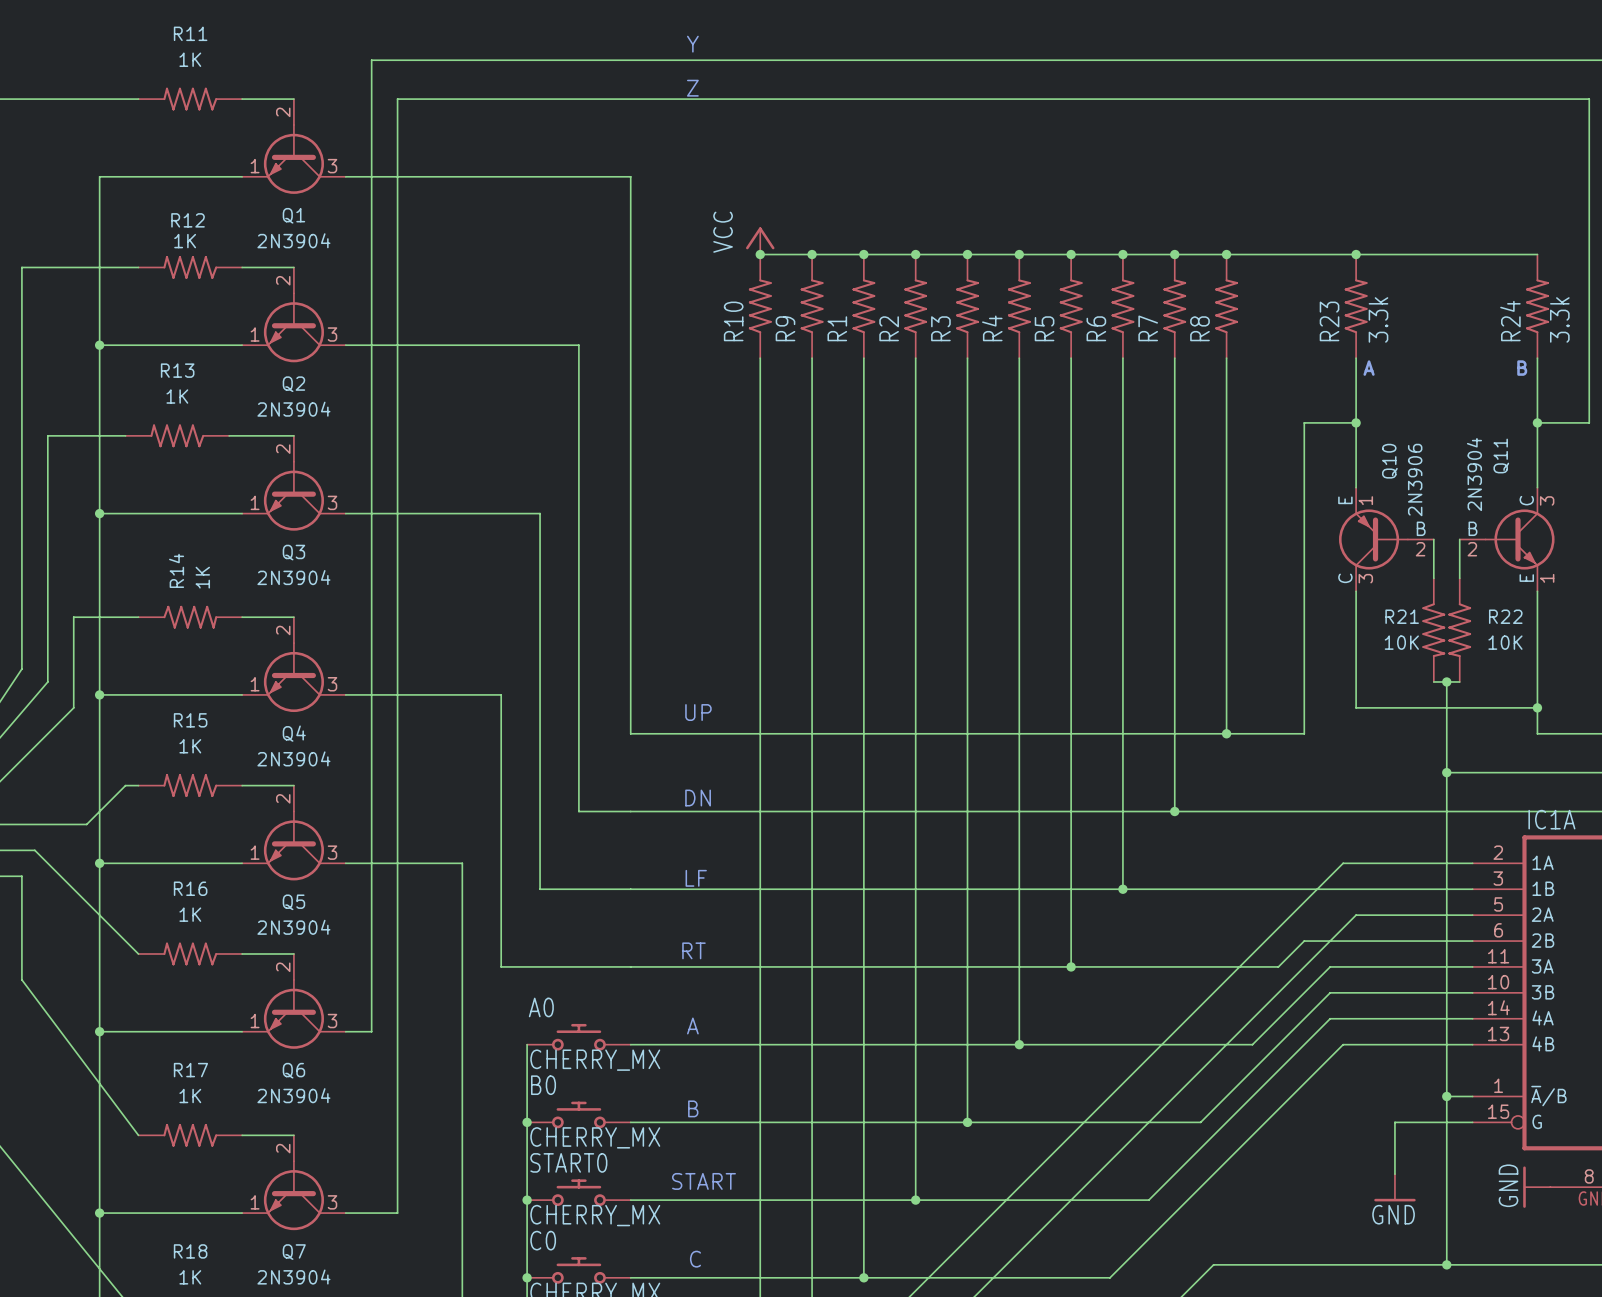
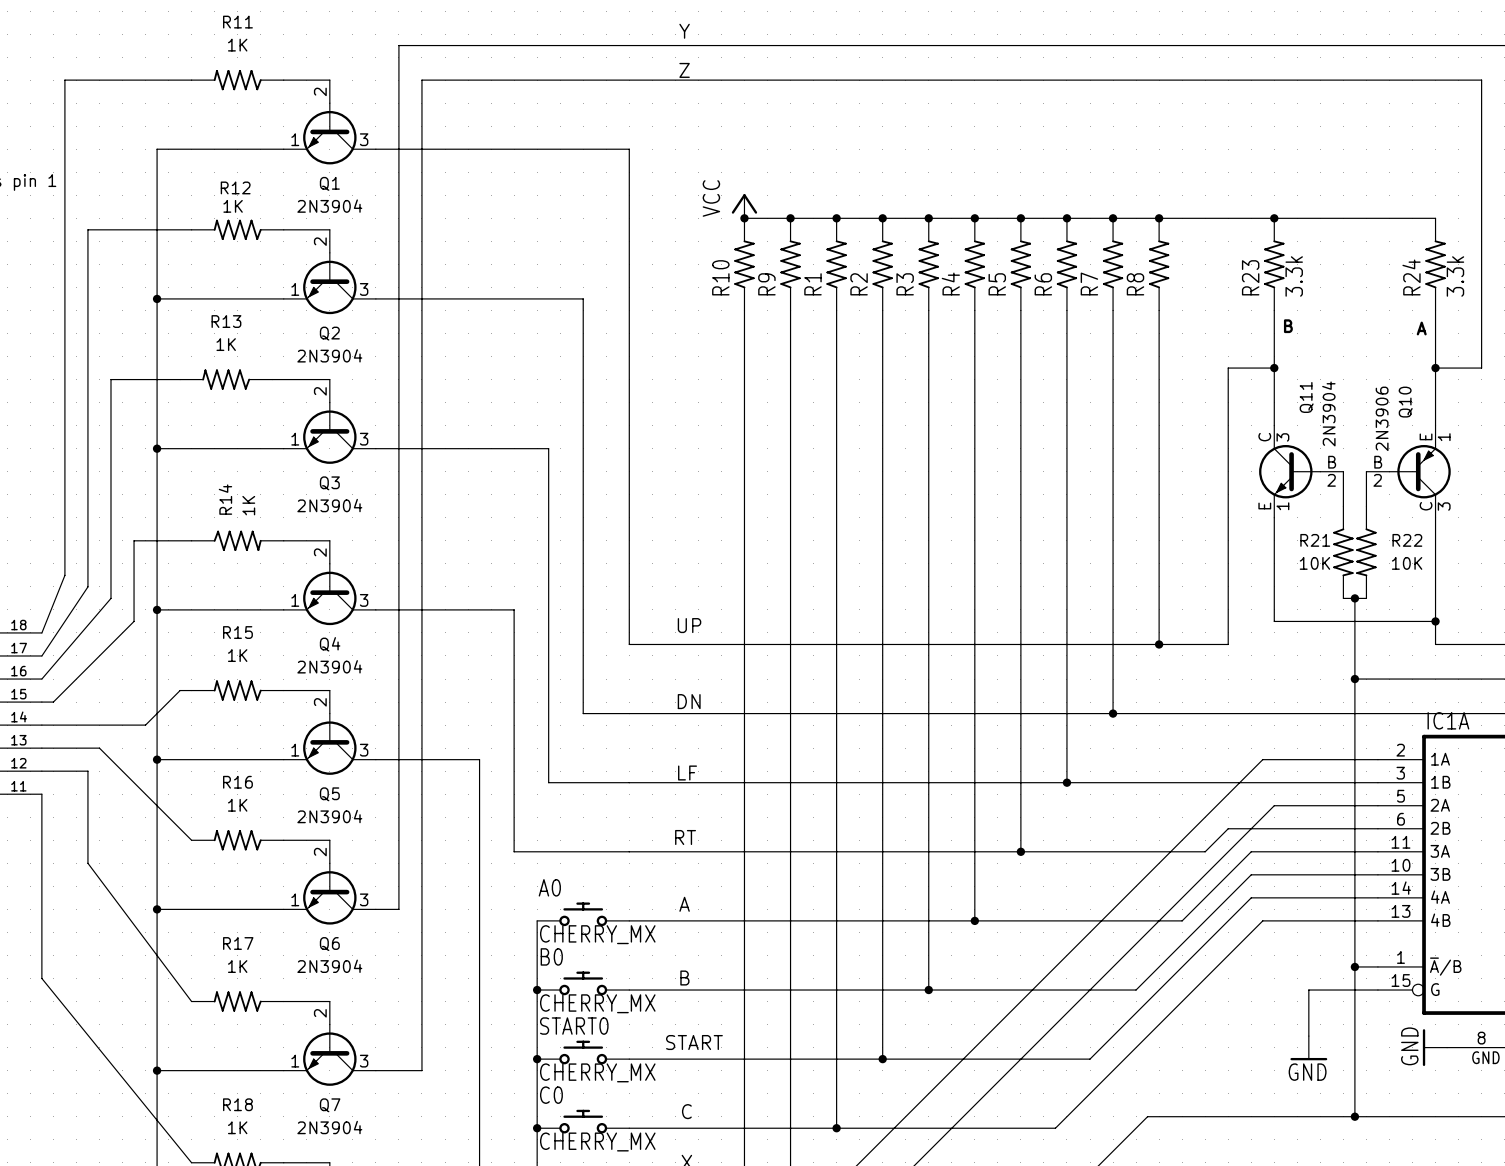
text: A (1369, 368) -> B (1288, 326)
text: B (1522, 368) -> none
text: none -> A (1421, 328)
Q10 flip: as is (1373, 539) -> left-right (1420, 471)
Q10 position: (1386, 539) -> (1408, 471)
Q11 position: (1507, 539) -> (1301, 471)
Q11 flip: as is (1520, 539) -> left-right (1289, 471)

